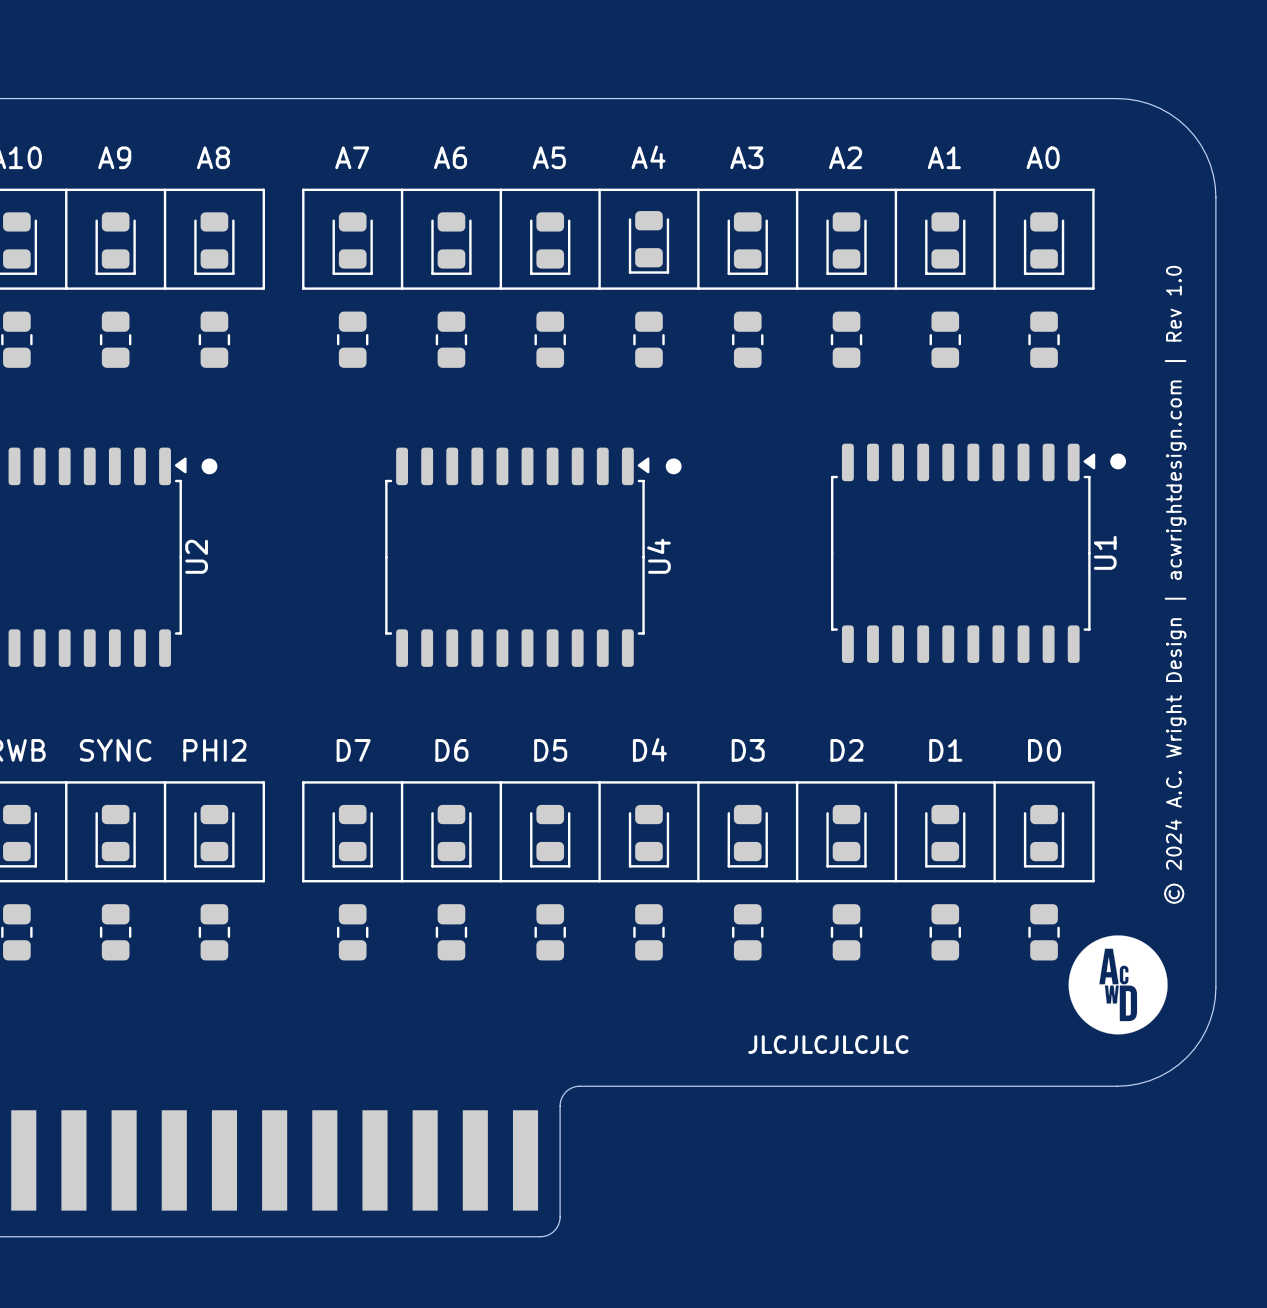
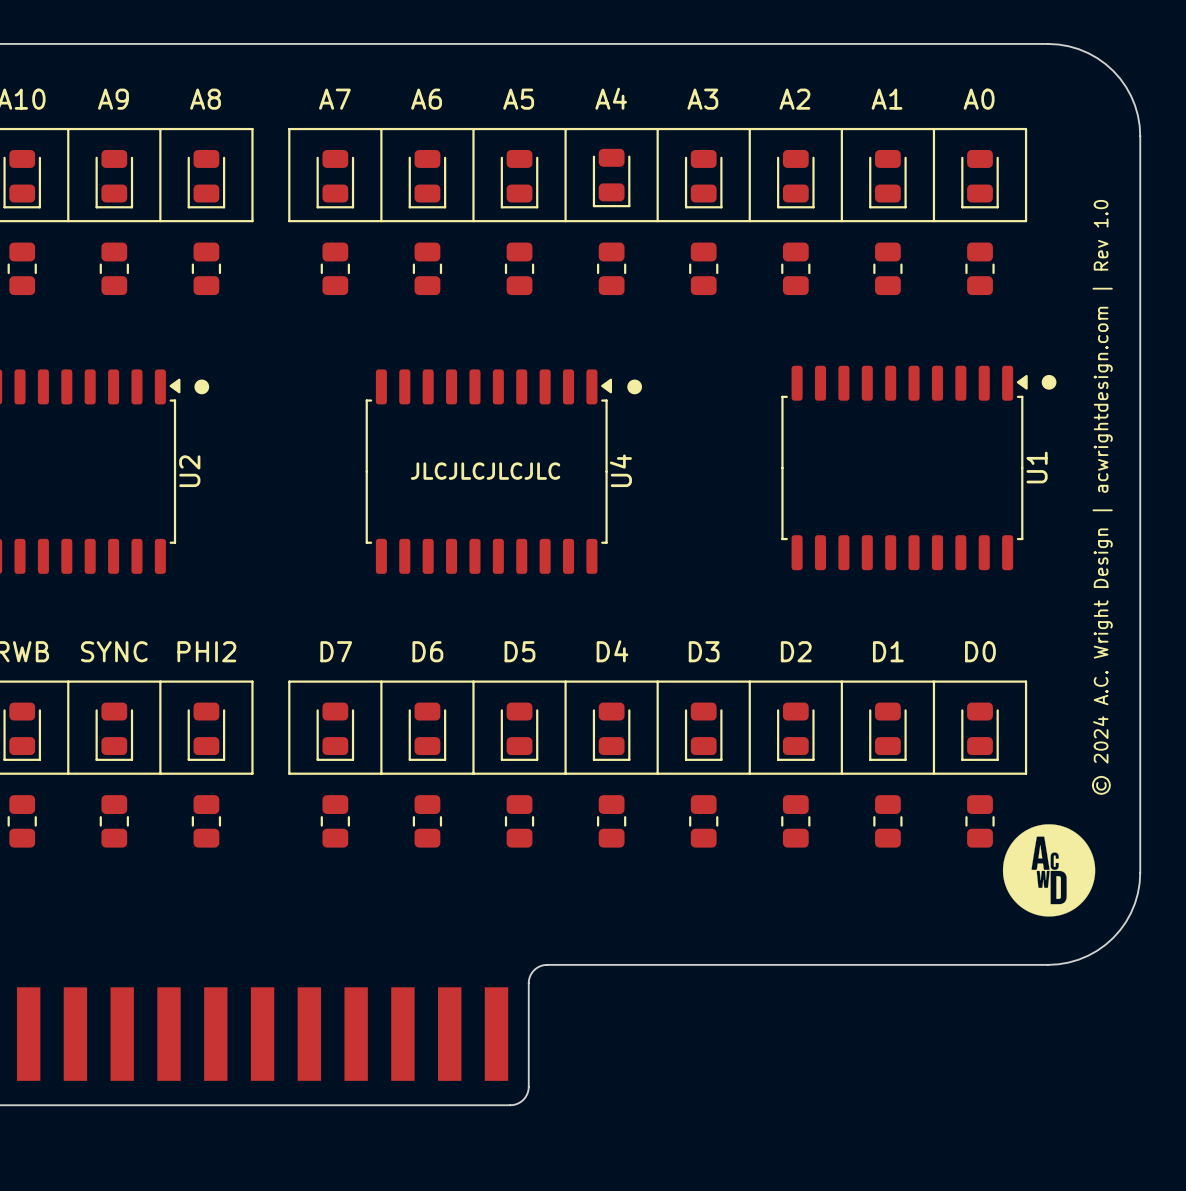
text: none -> JLCJLCJLCJLC (485, 471)
text: JLCJLCJLCJLC (828, 1044) -> none

